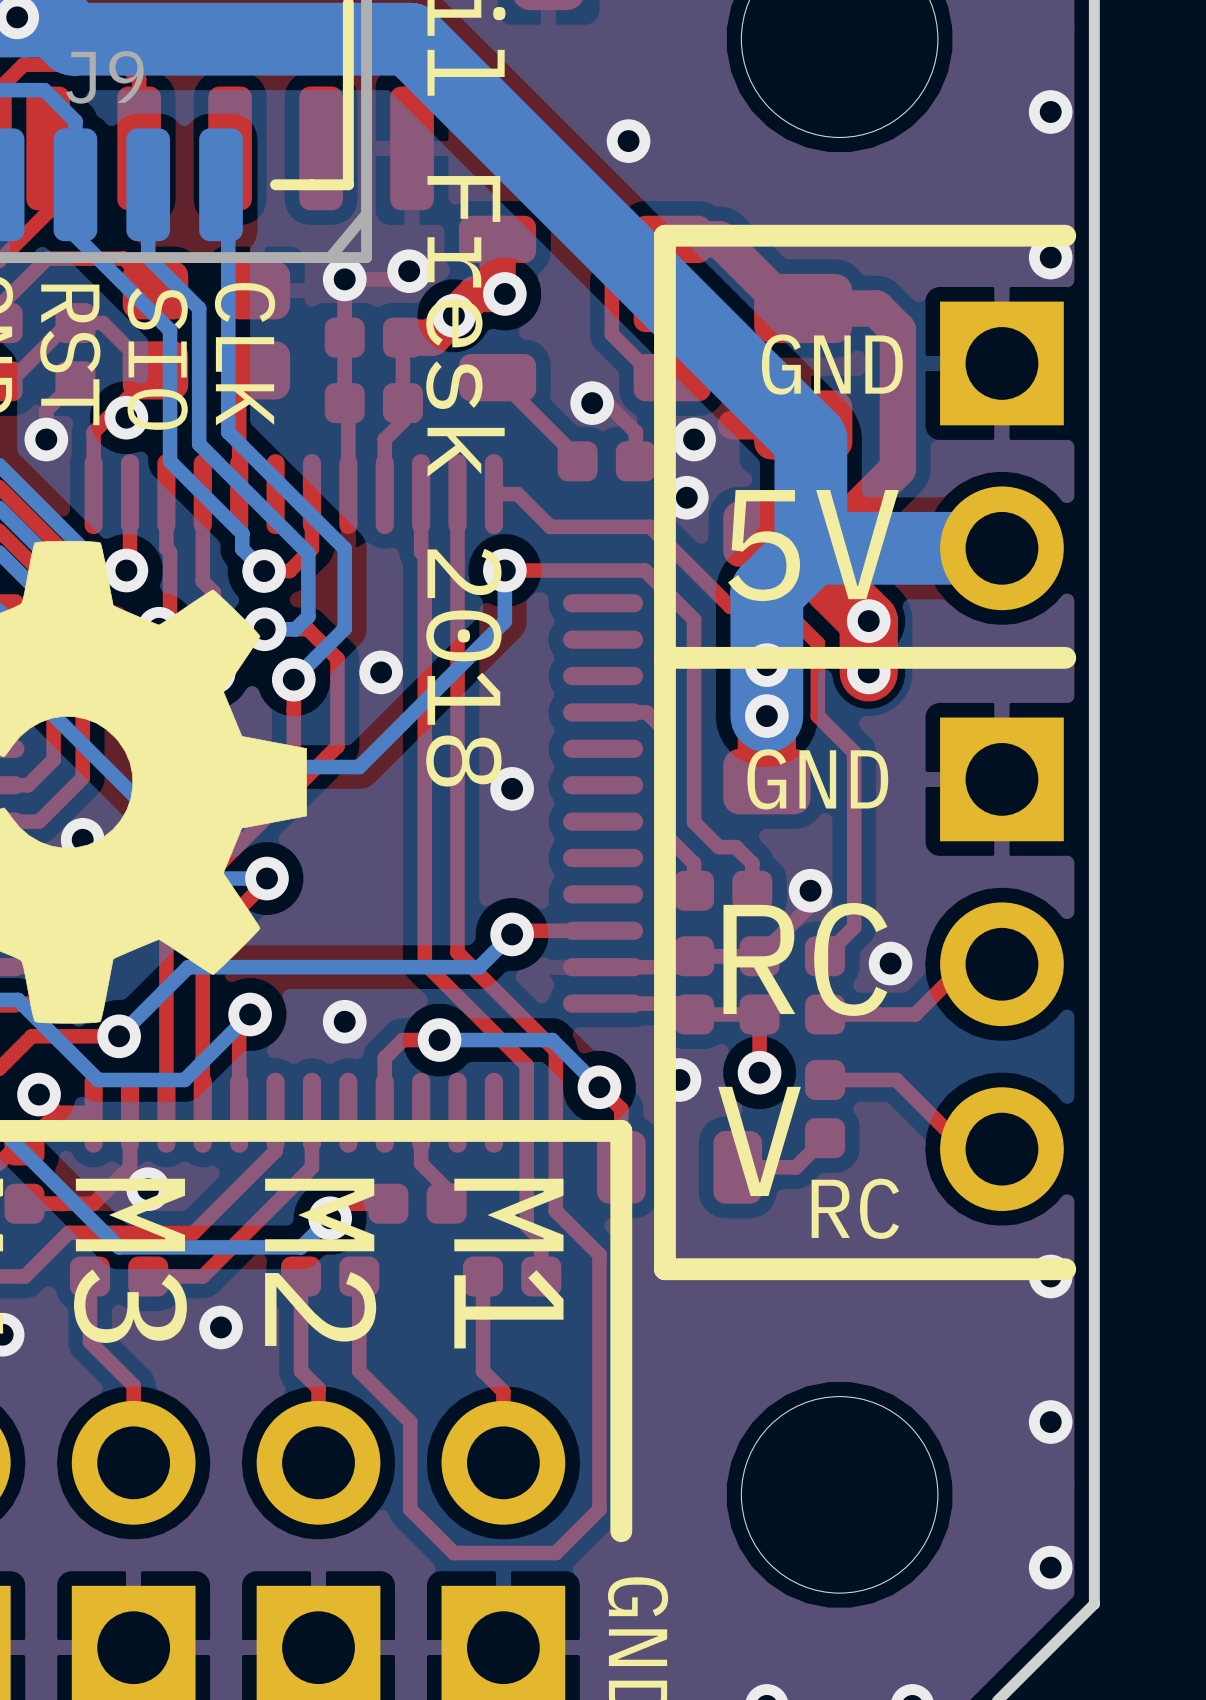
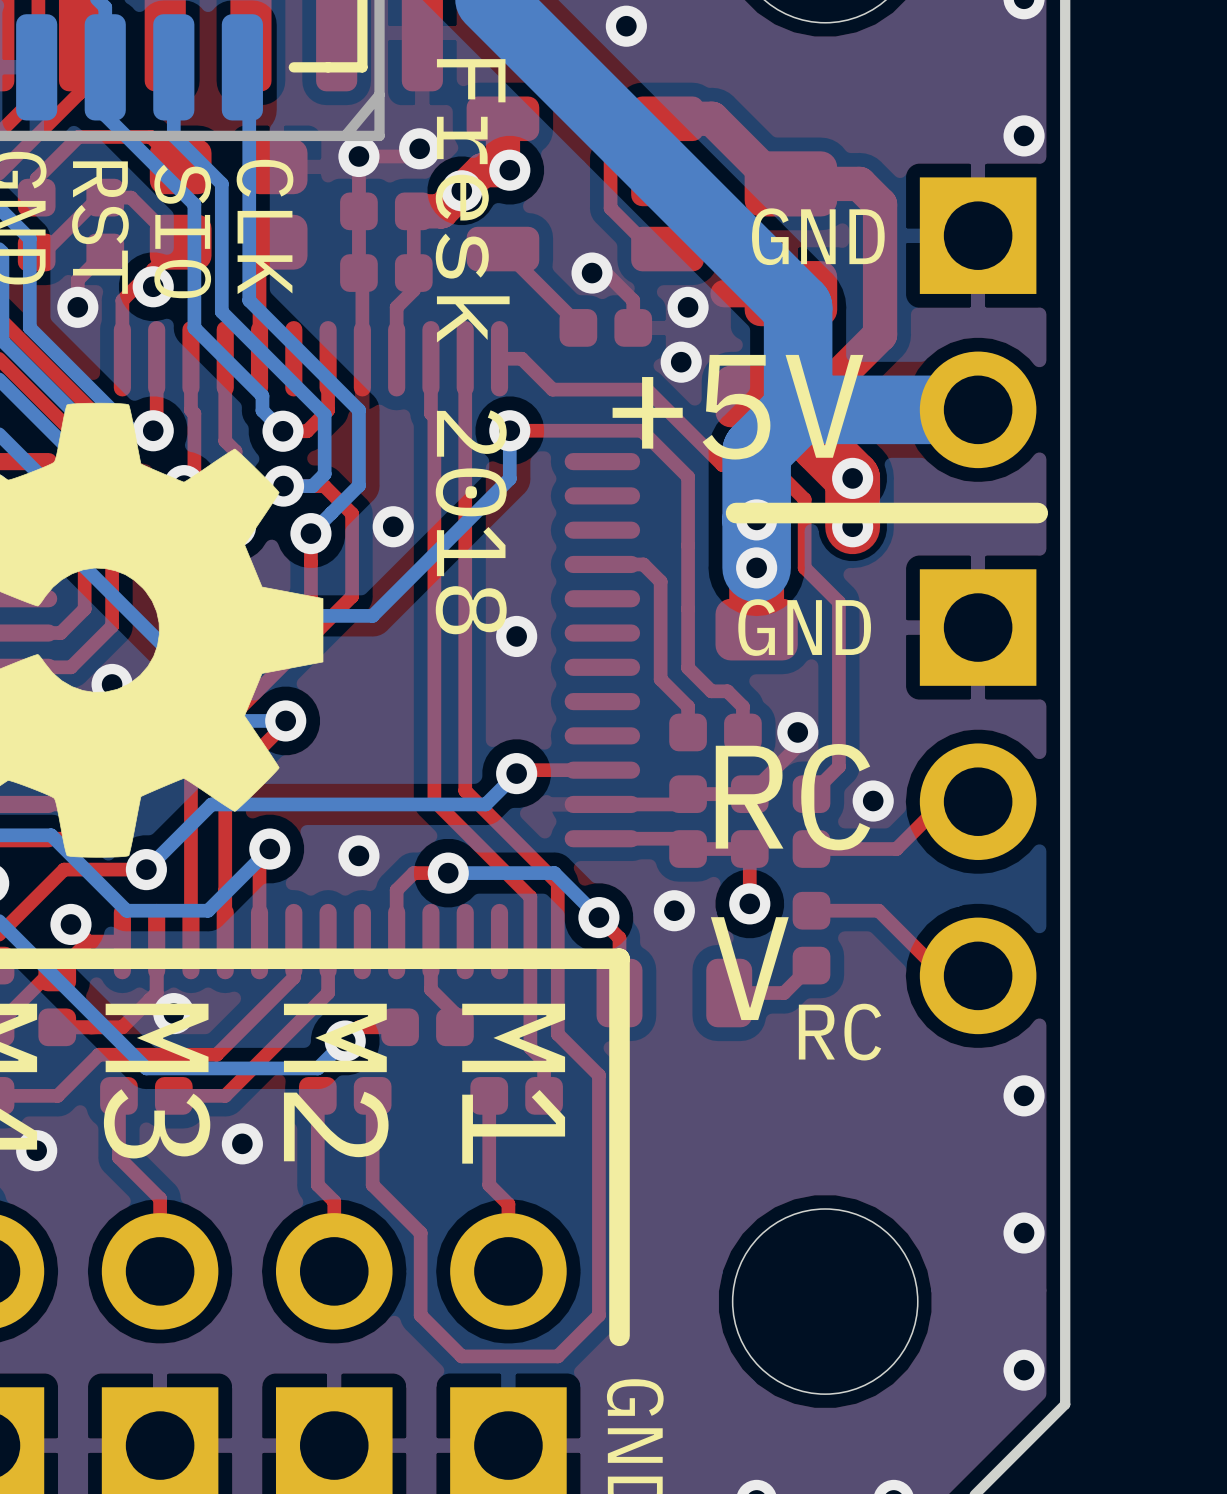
line: (1065, 235) (664, 235) (664, 1269) (1065, 1269) -> none
text: 5V (813, 545) -> +5V (737, 407)
line: (745, 657) (664, 657) -> none

